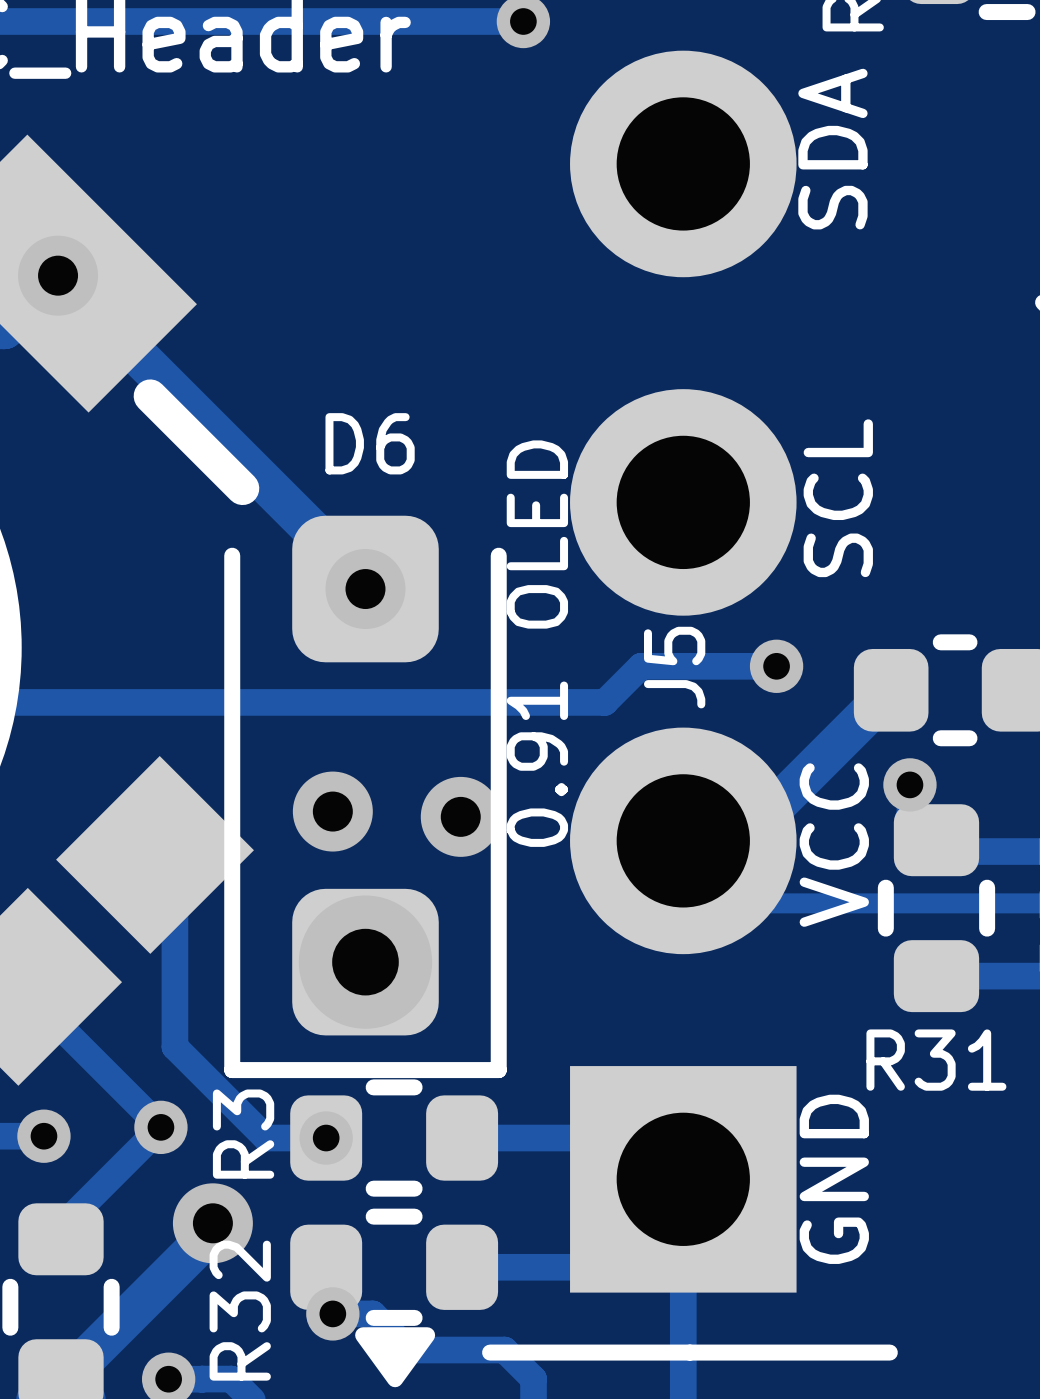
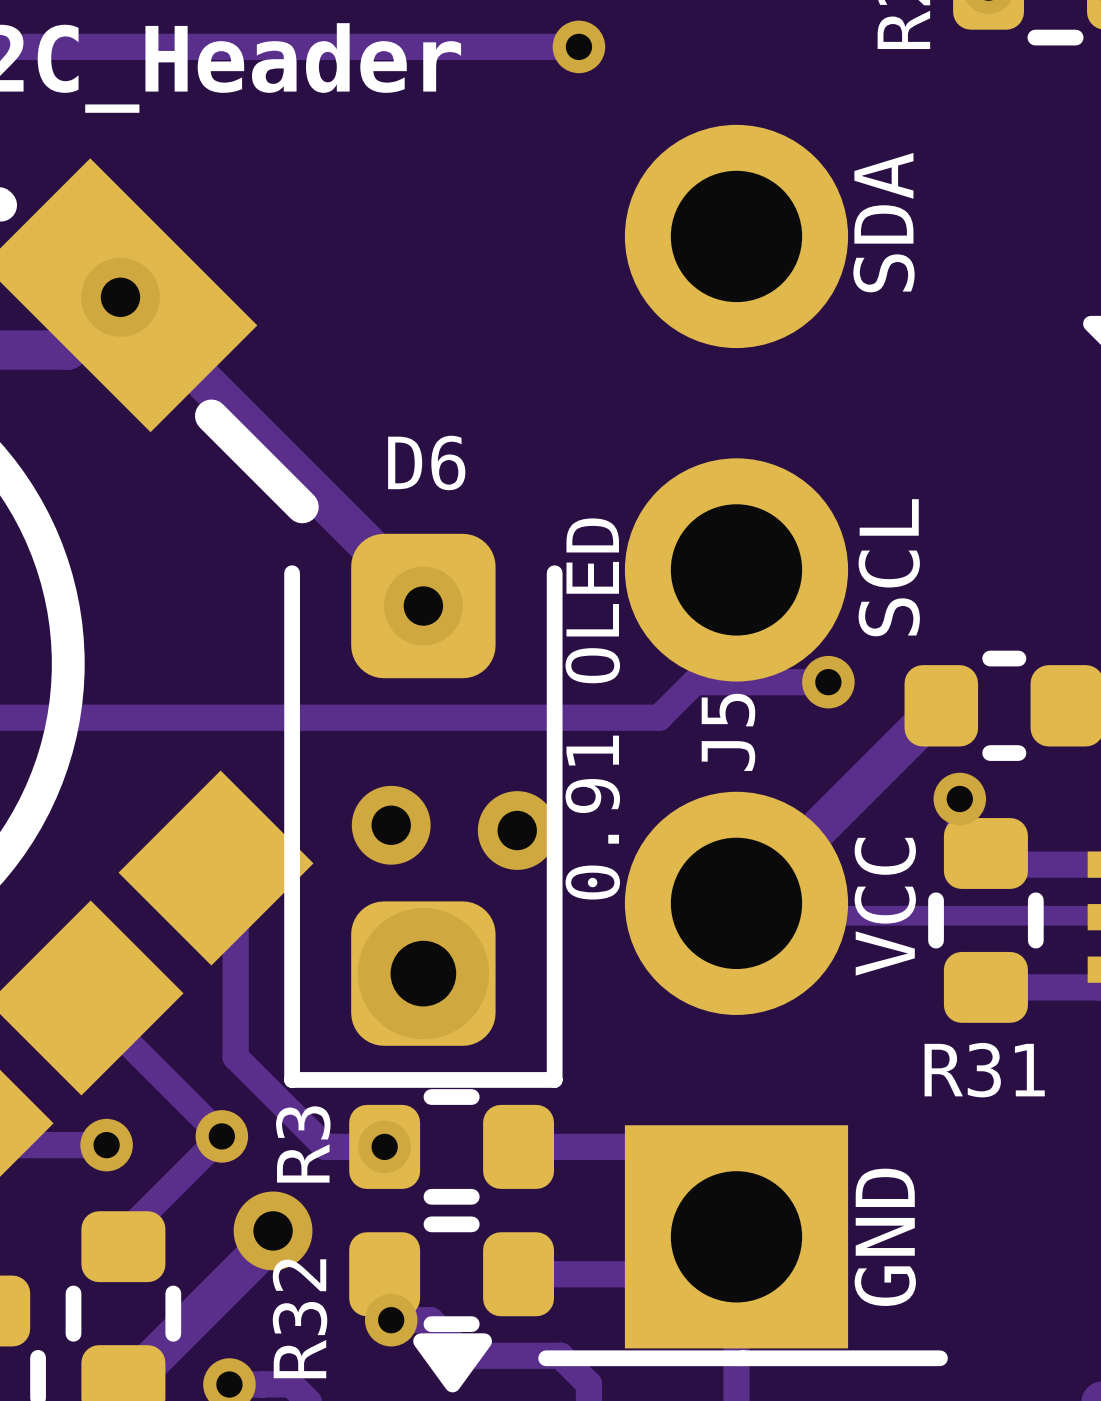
J5 position: (683, 671) -> (736, 736)

